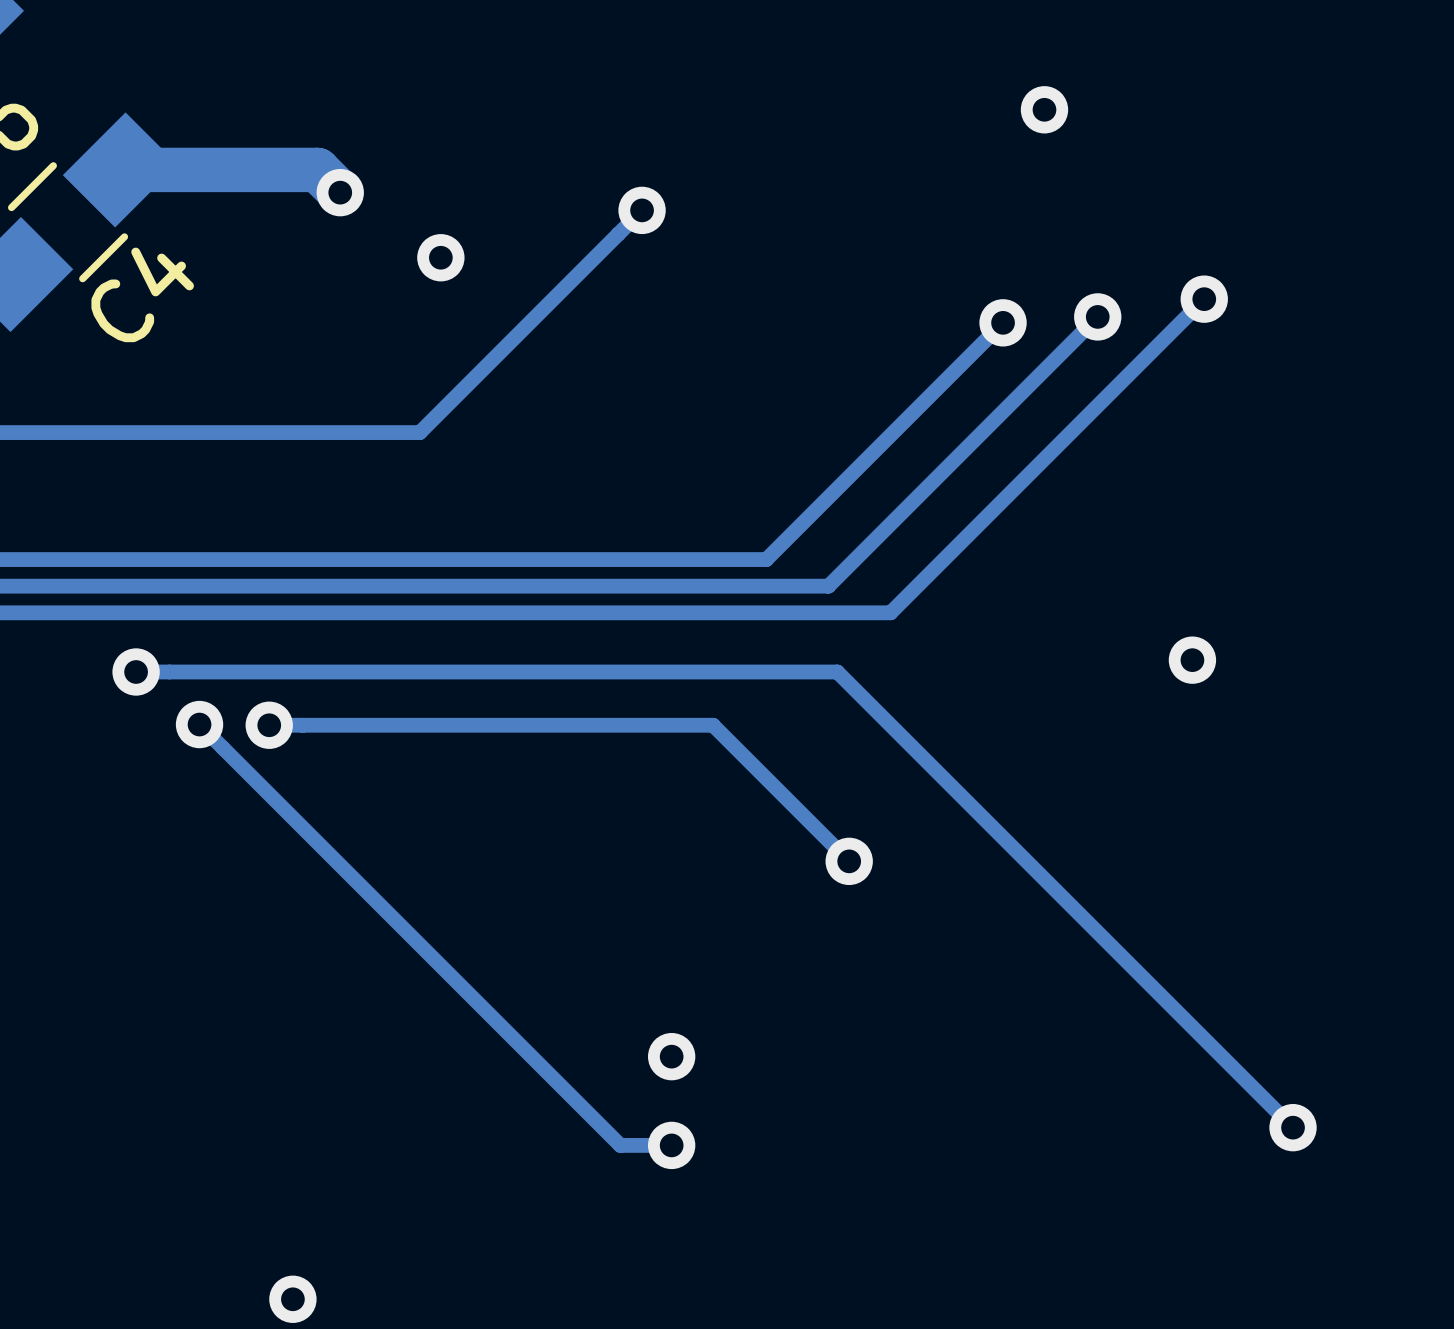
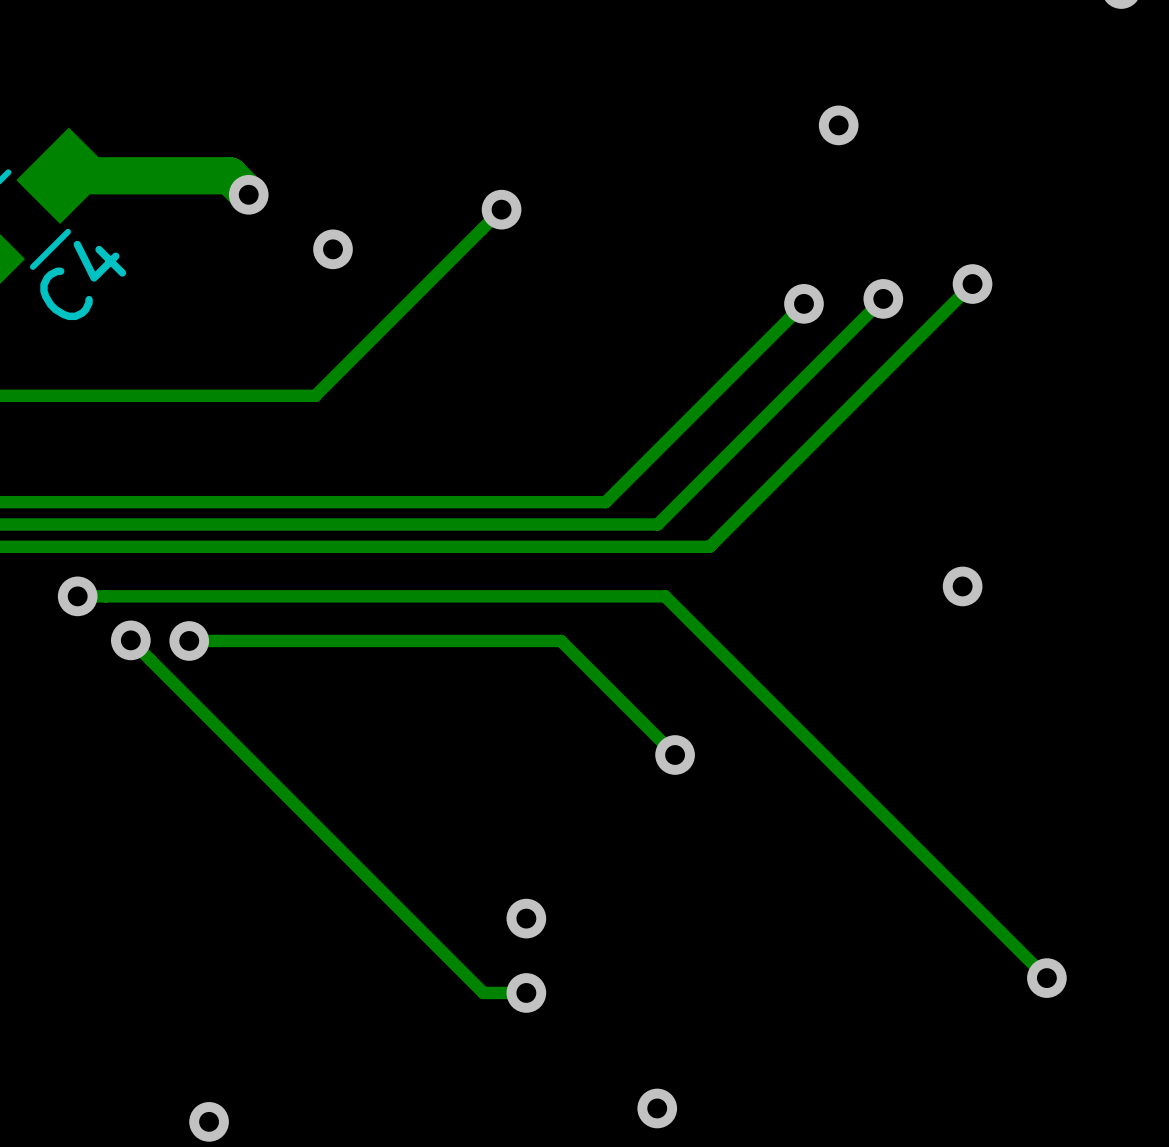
via: none -> (657, 1108)

